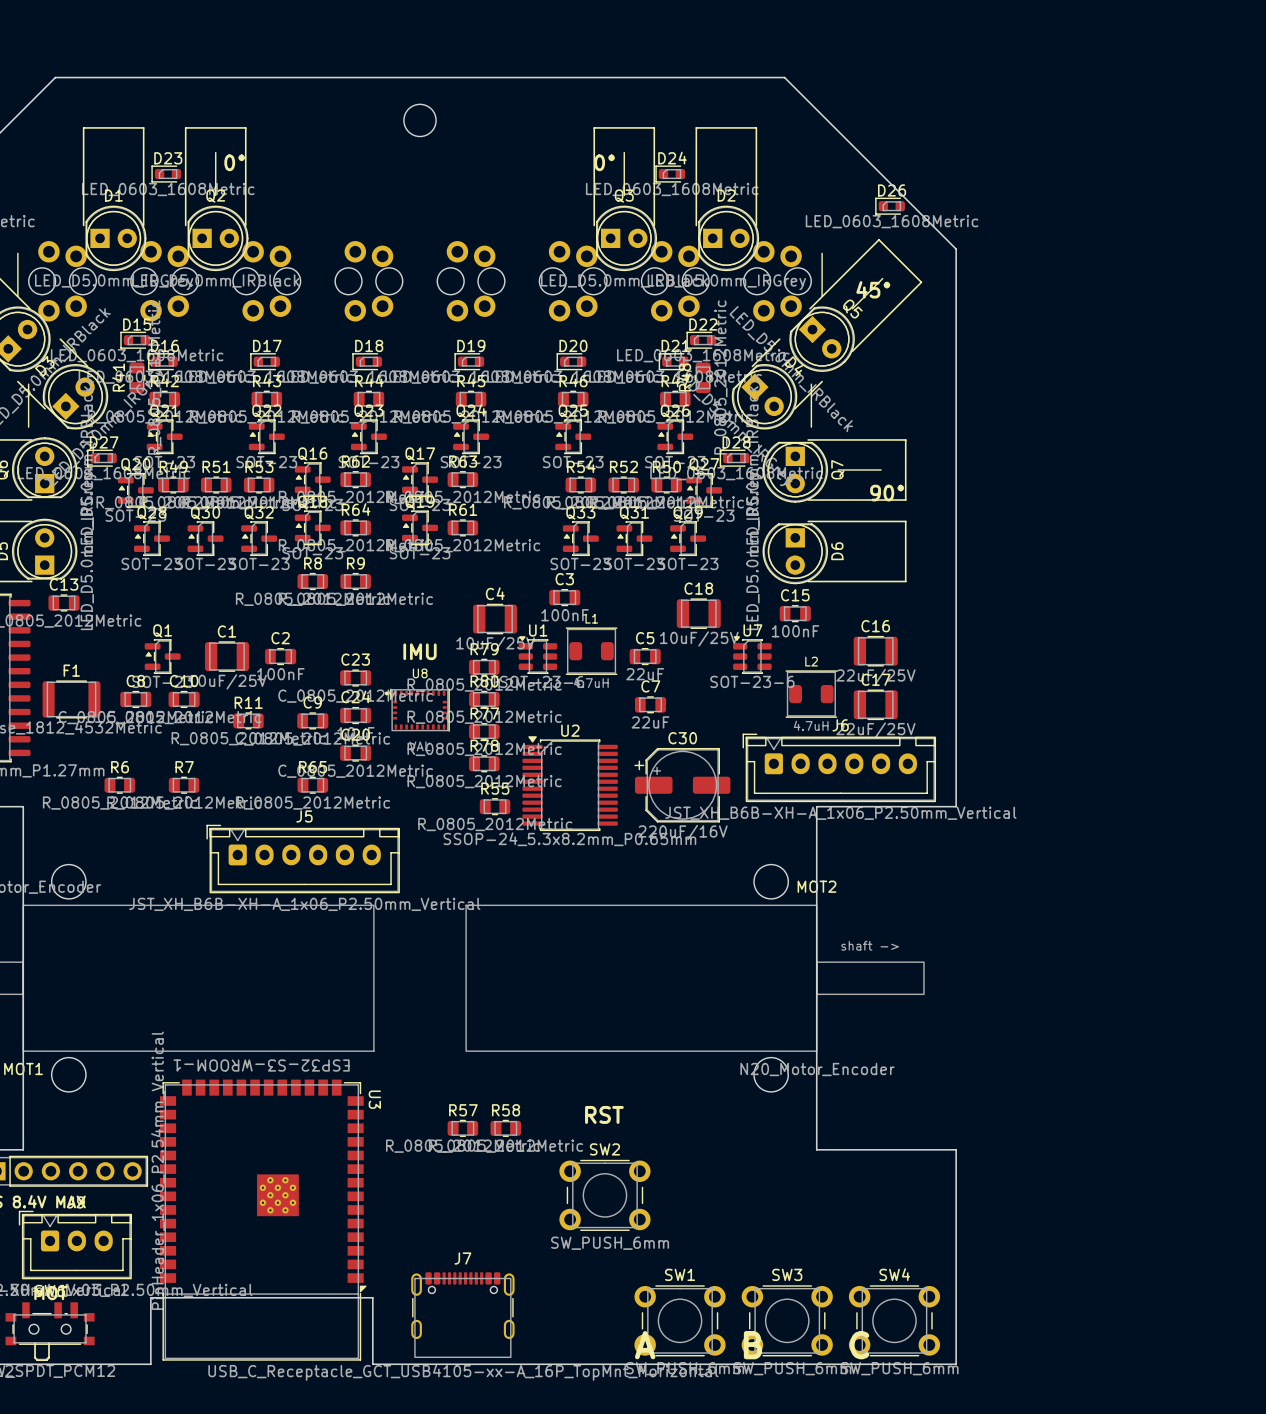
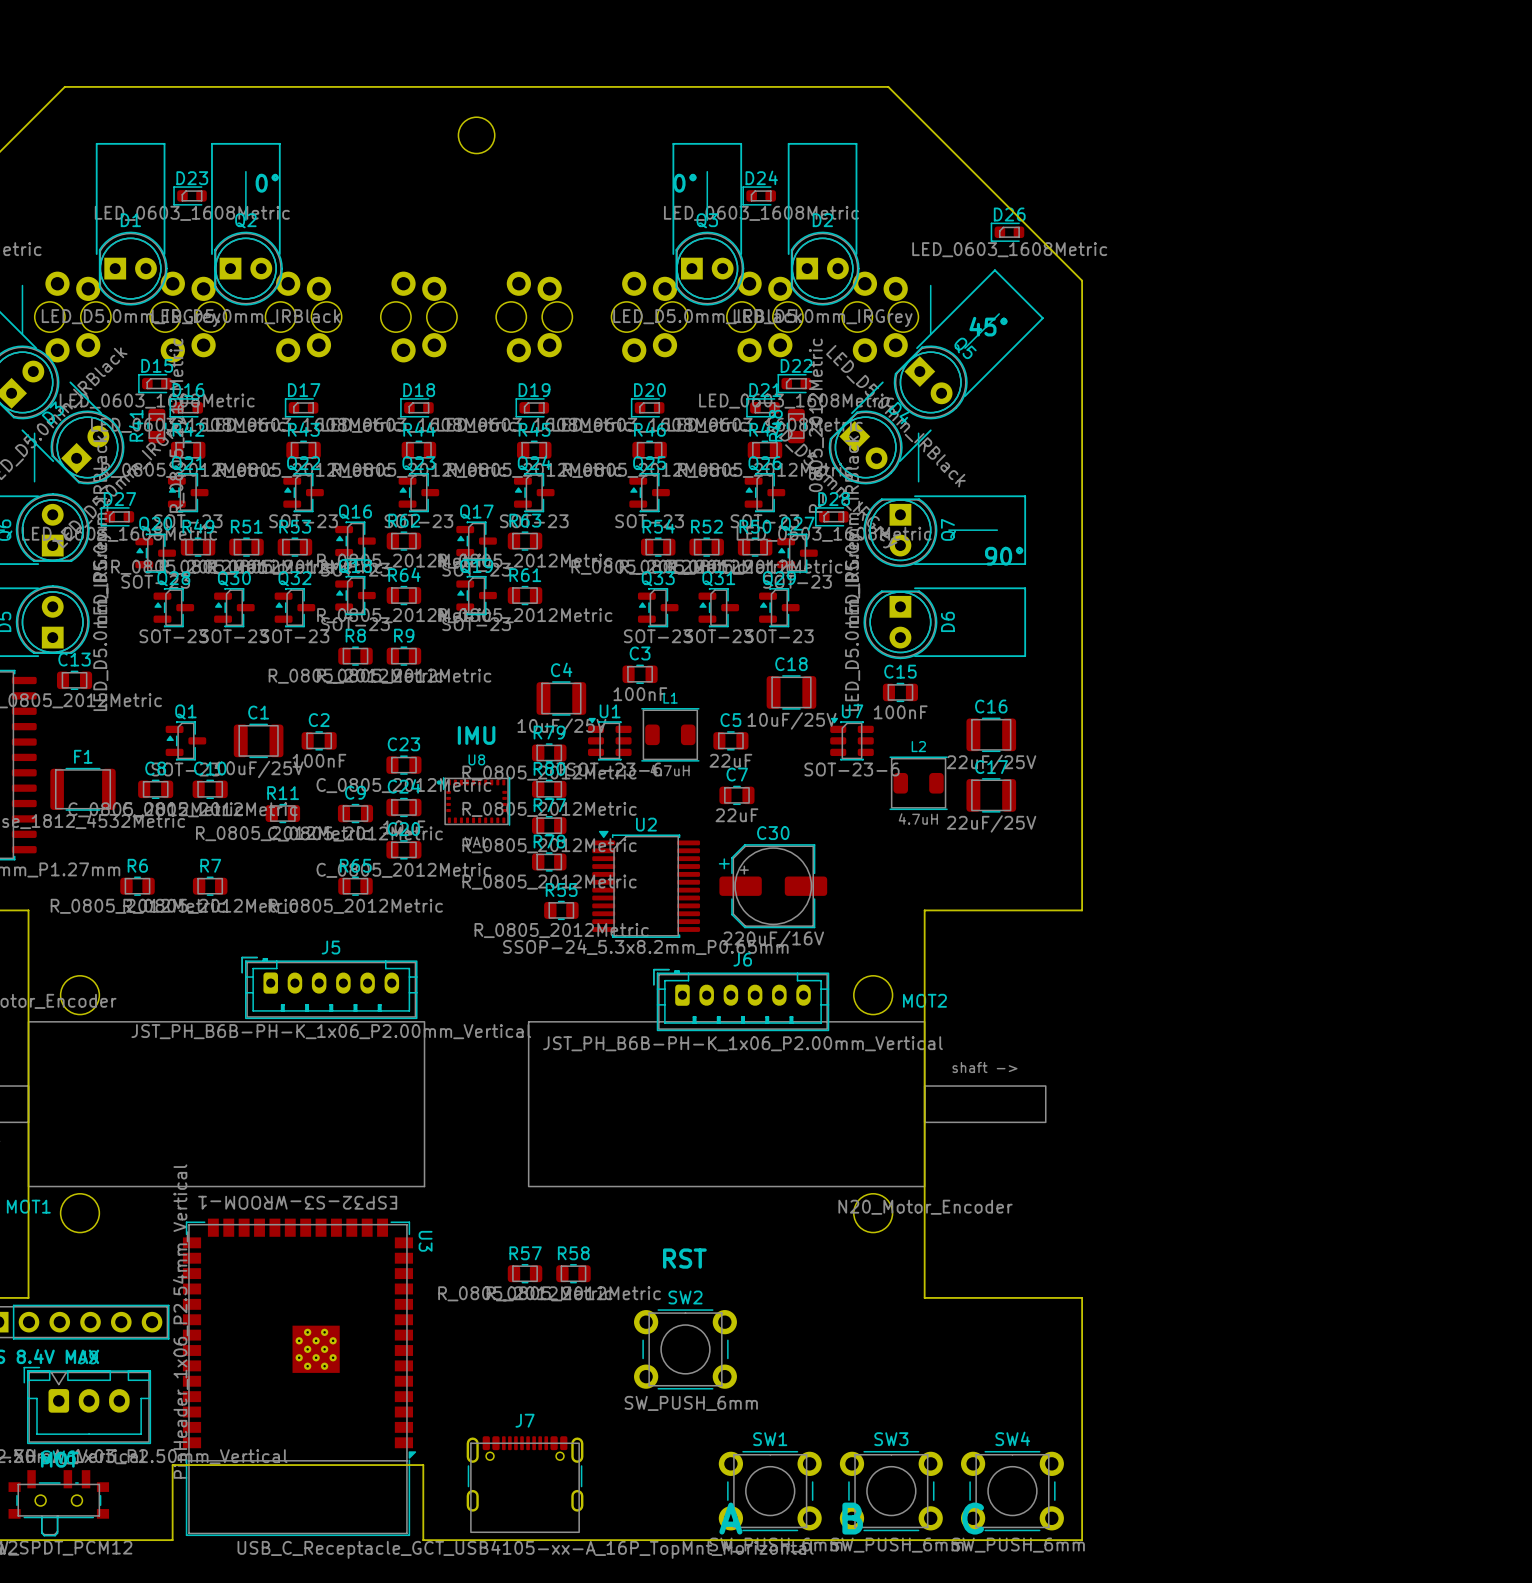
J6 footprint: [742, 733, 936, 803] -> [653, 968, 830, 1032]
J6 value: JST_XH_B6B-XH-A_1x06_P2.50mm_Vertical (840, 813) -> JST_PH_B6B-PH-K_1x06_P2.00mm_Vertical (743, 1043)
J5 footprint: [206, 824, 400, 894] -> [241, 956, 418, 1020]
J5 value: JST_XH_B6B-XH-A_1x06_P2.50mm_Vertical (304, 904) -> JST_PH_B6B-PH-K_1x06_P2.00mm_Vertical (331, 1031)

